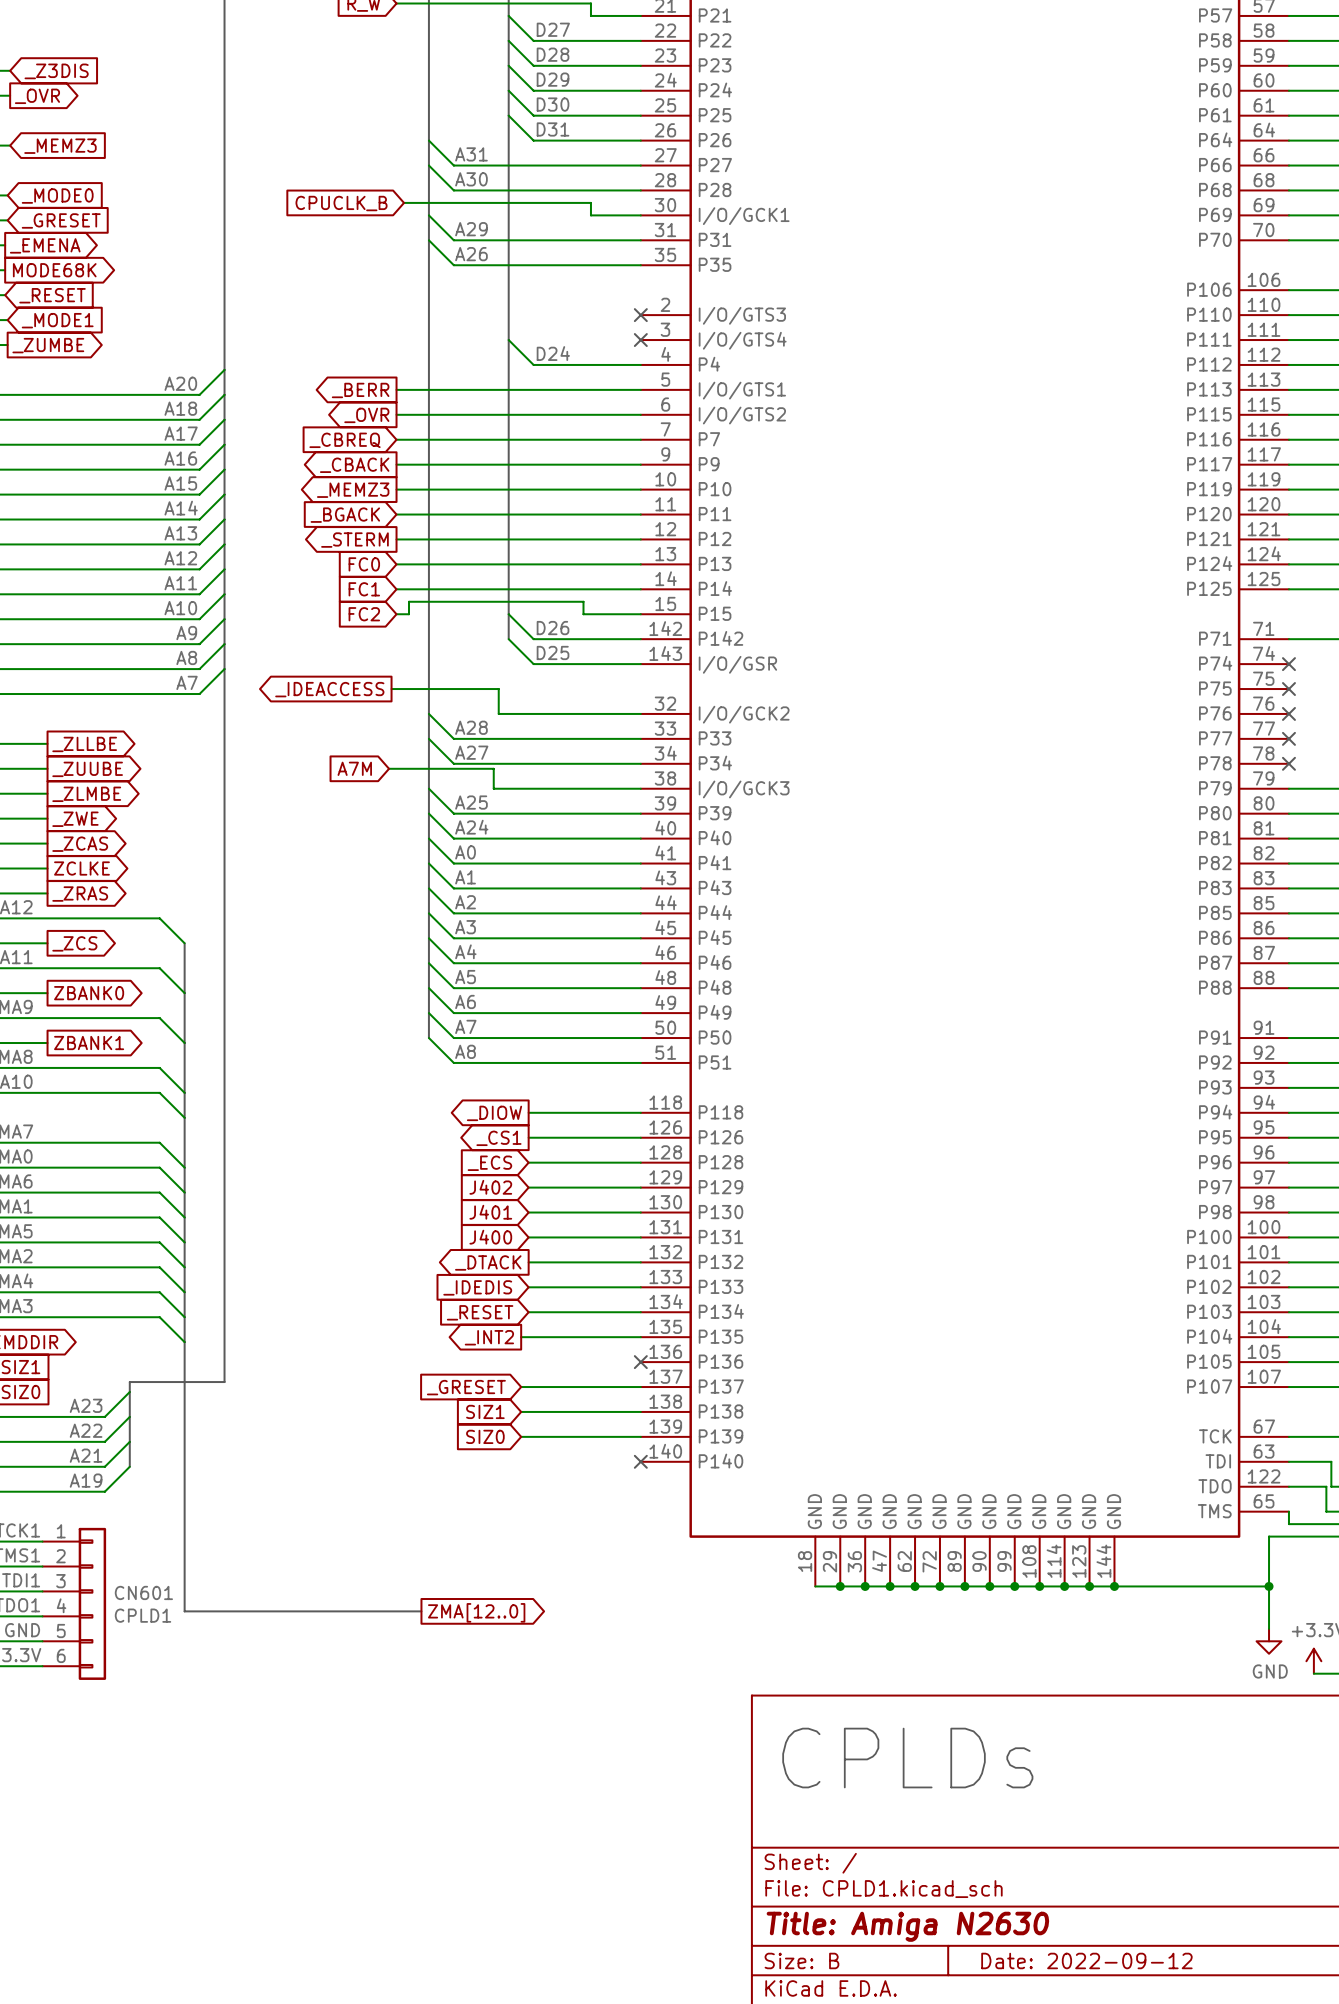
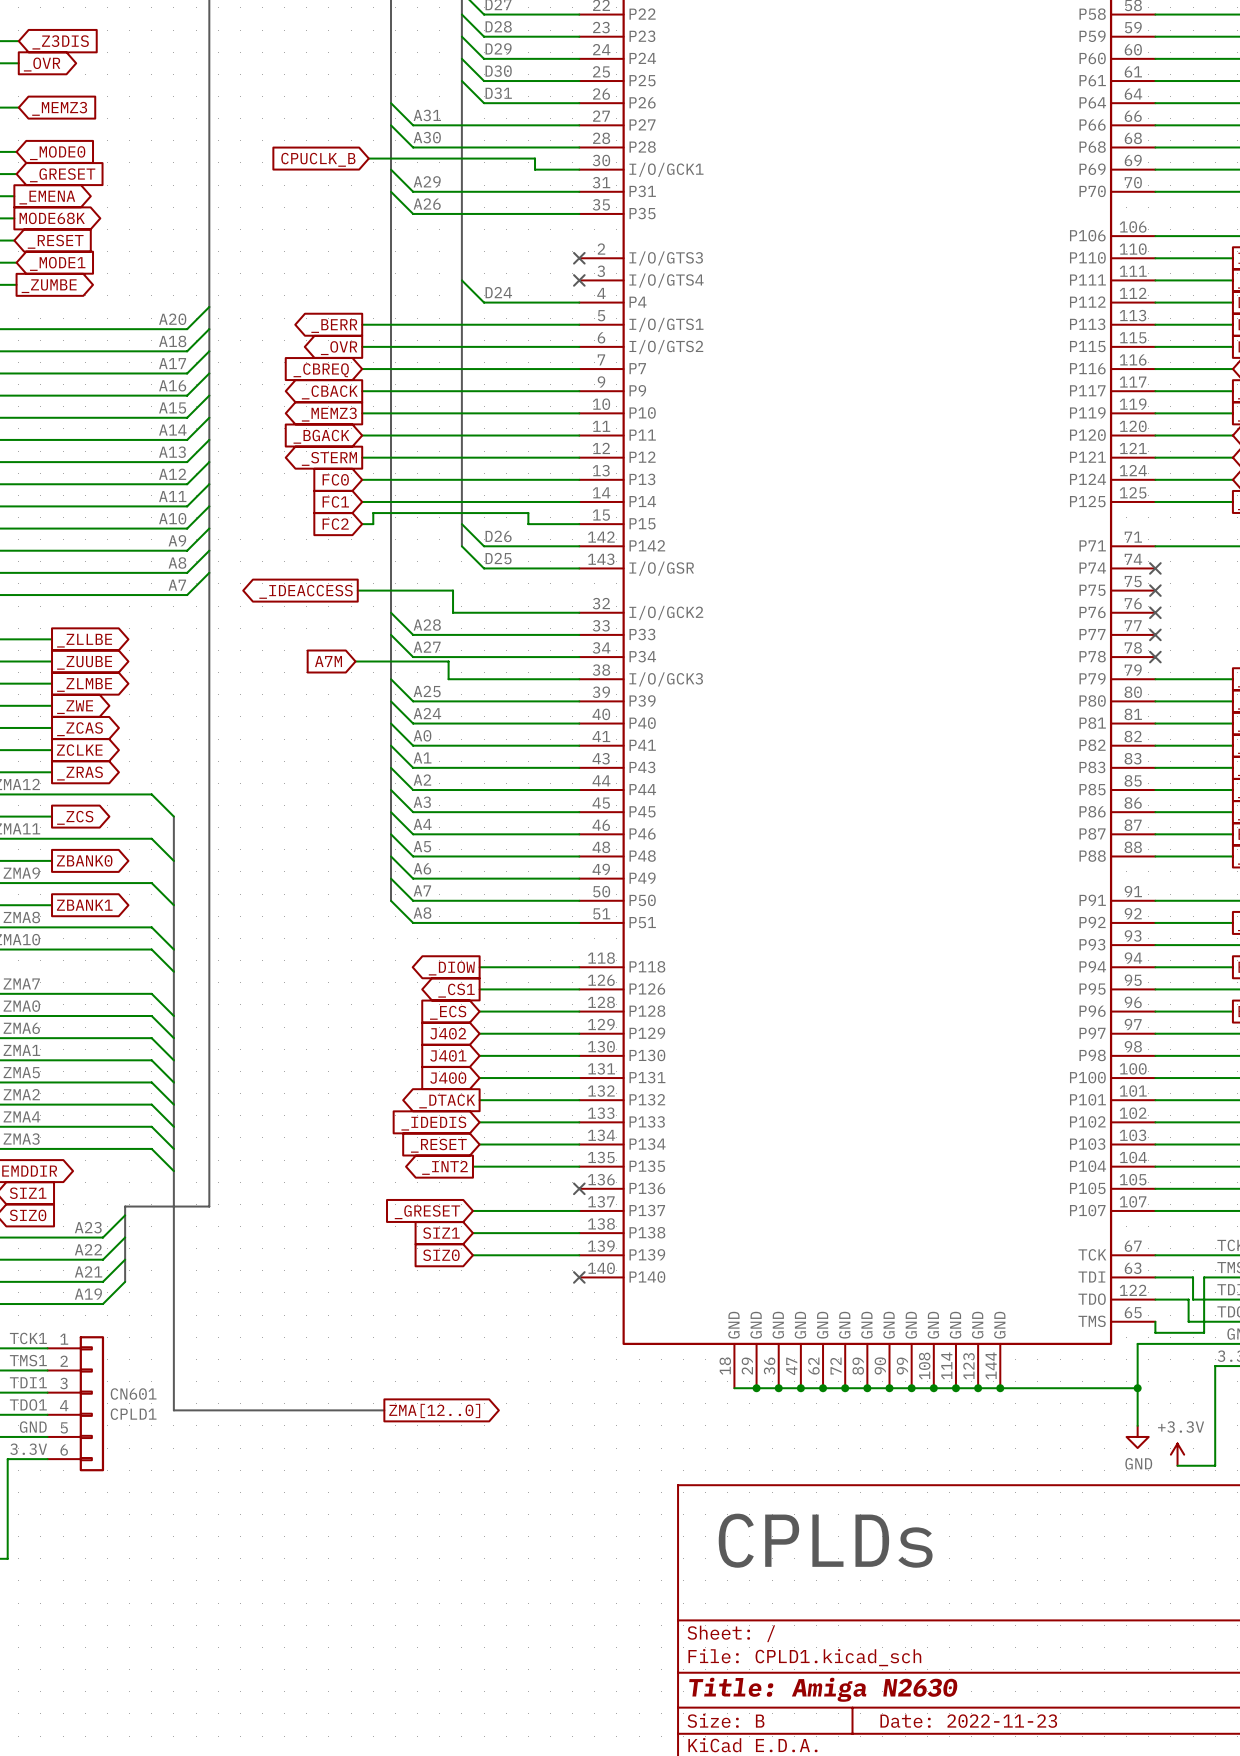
title block: Date: 2022-09-12 (1086, 1960) -> Date: 2022-11-23 (968, 1721)

